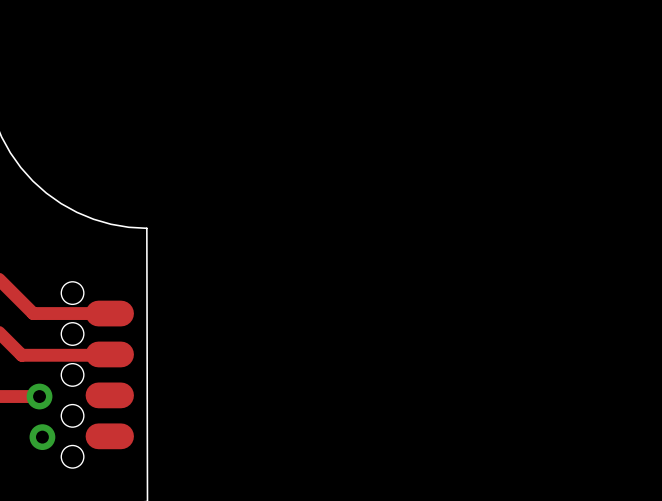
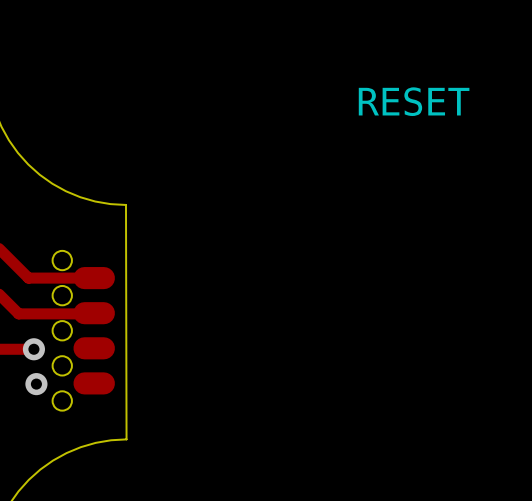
text: none -> RESET (414, 101)

